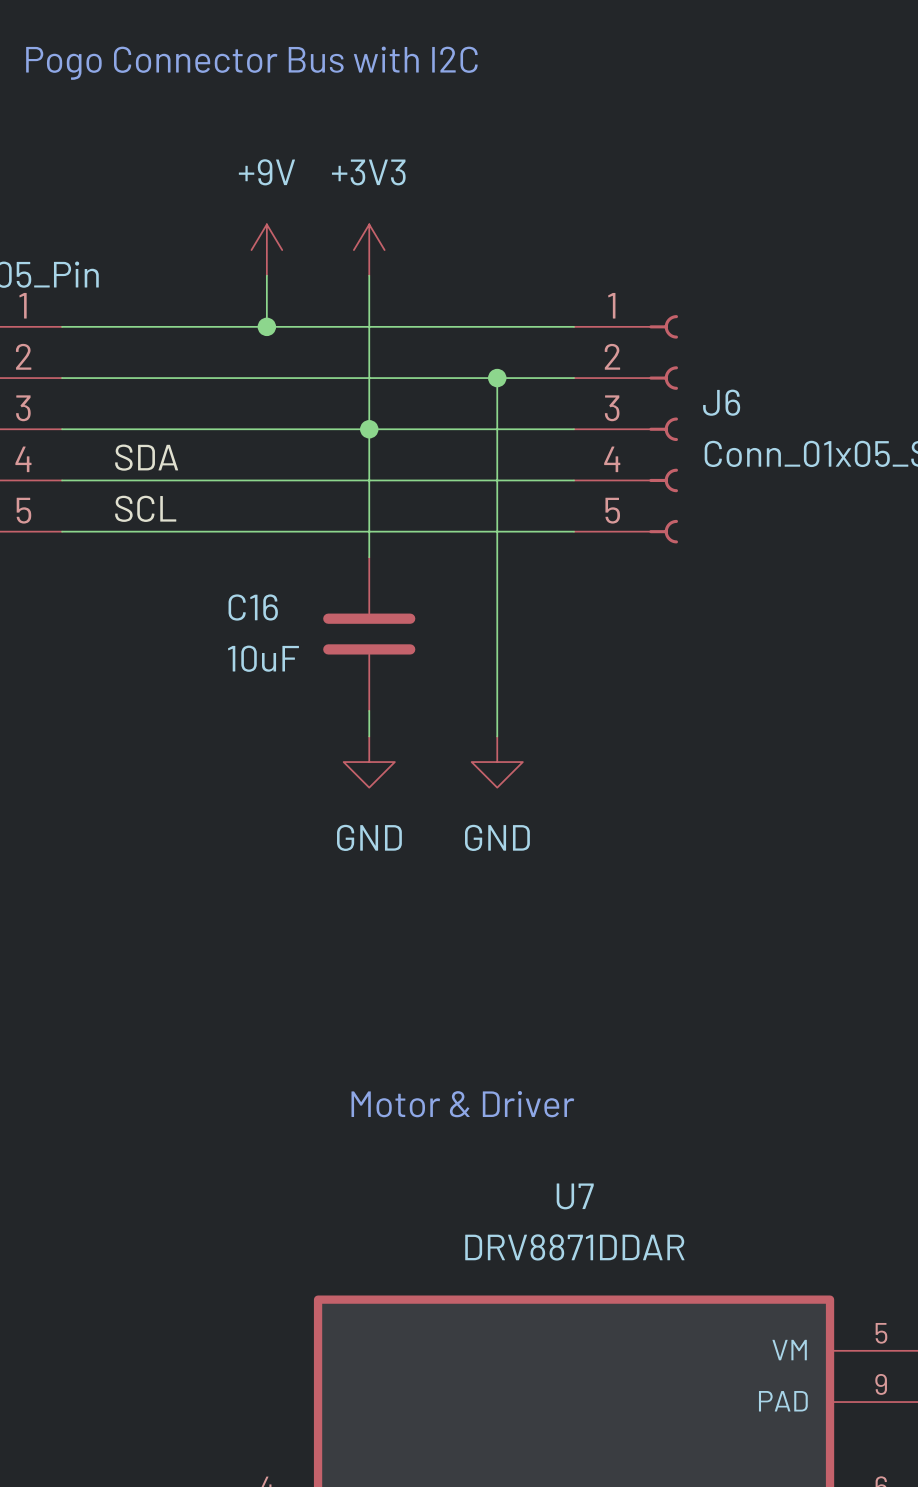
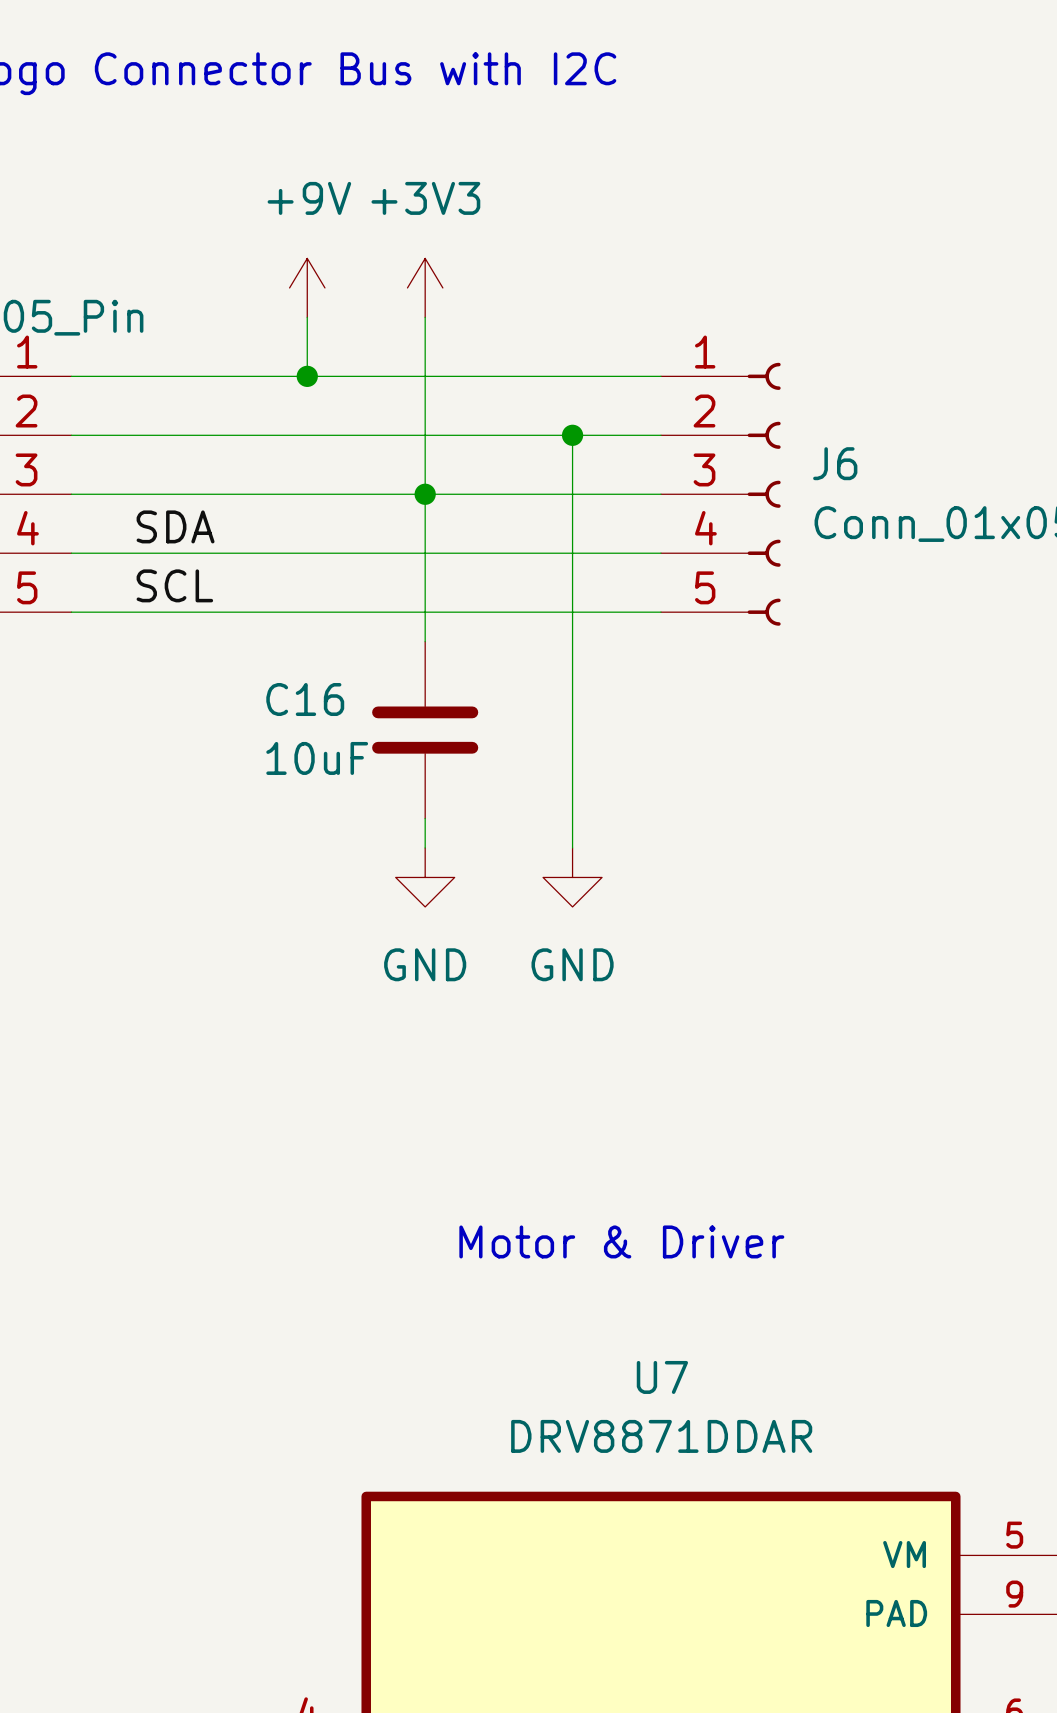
text position: Motor & Driver (462, 1104) -> Motor & Driver (621, 1241)

